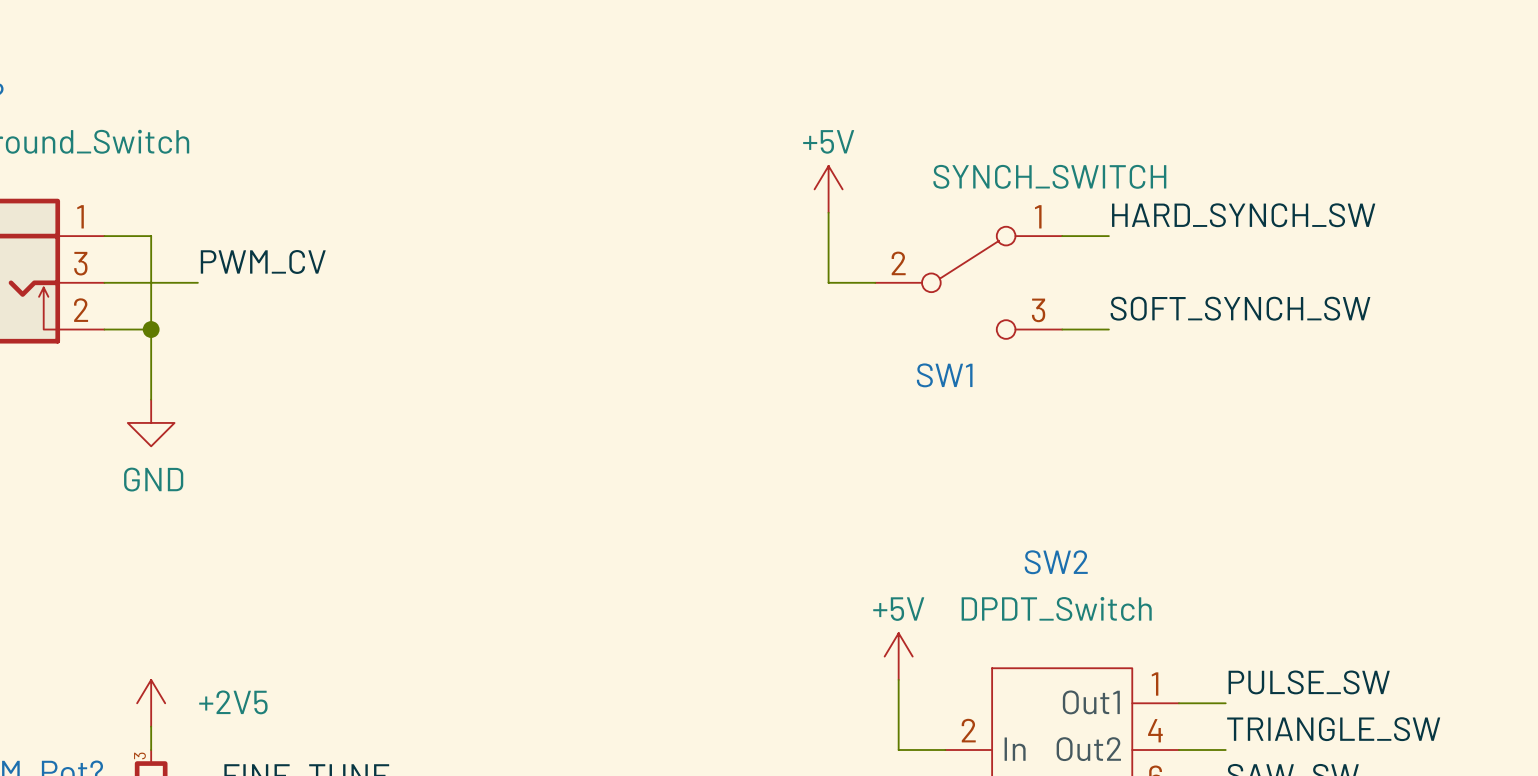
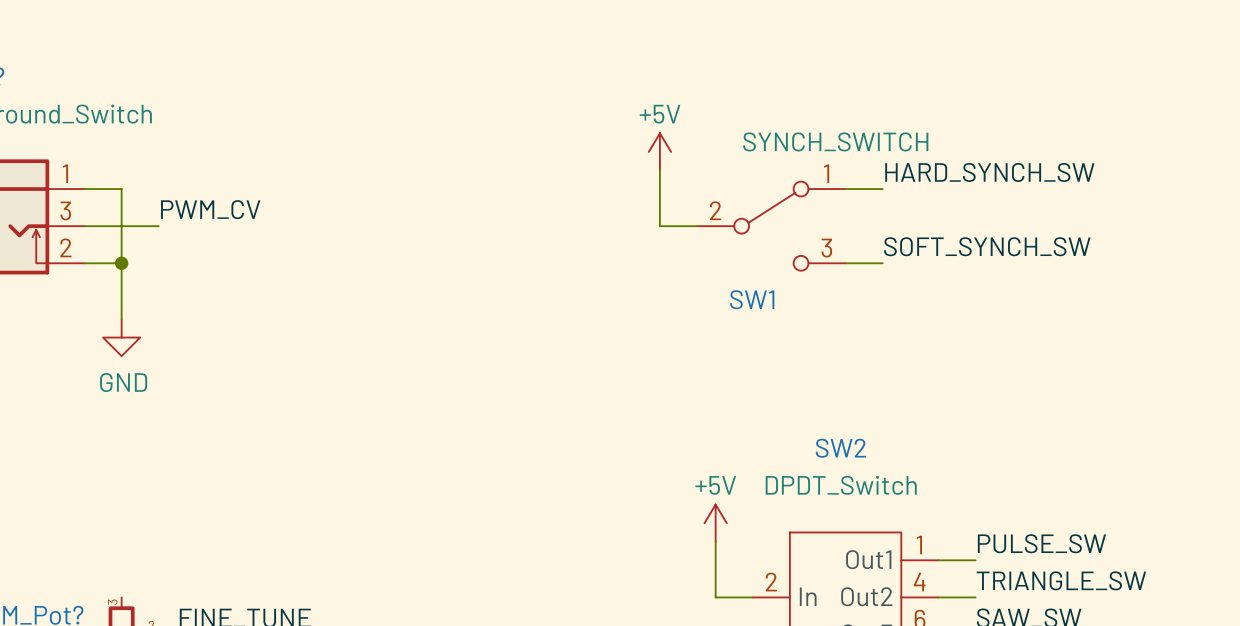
power symbol: +2V5 (151, 703) -> none
wire: (151, 726) (151, 750) -> none

